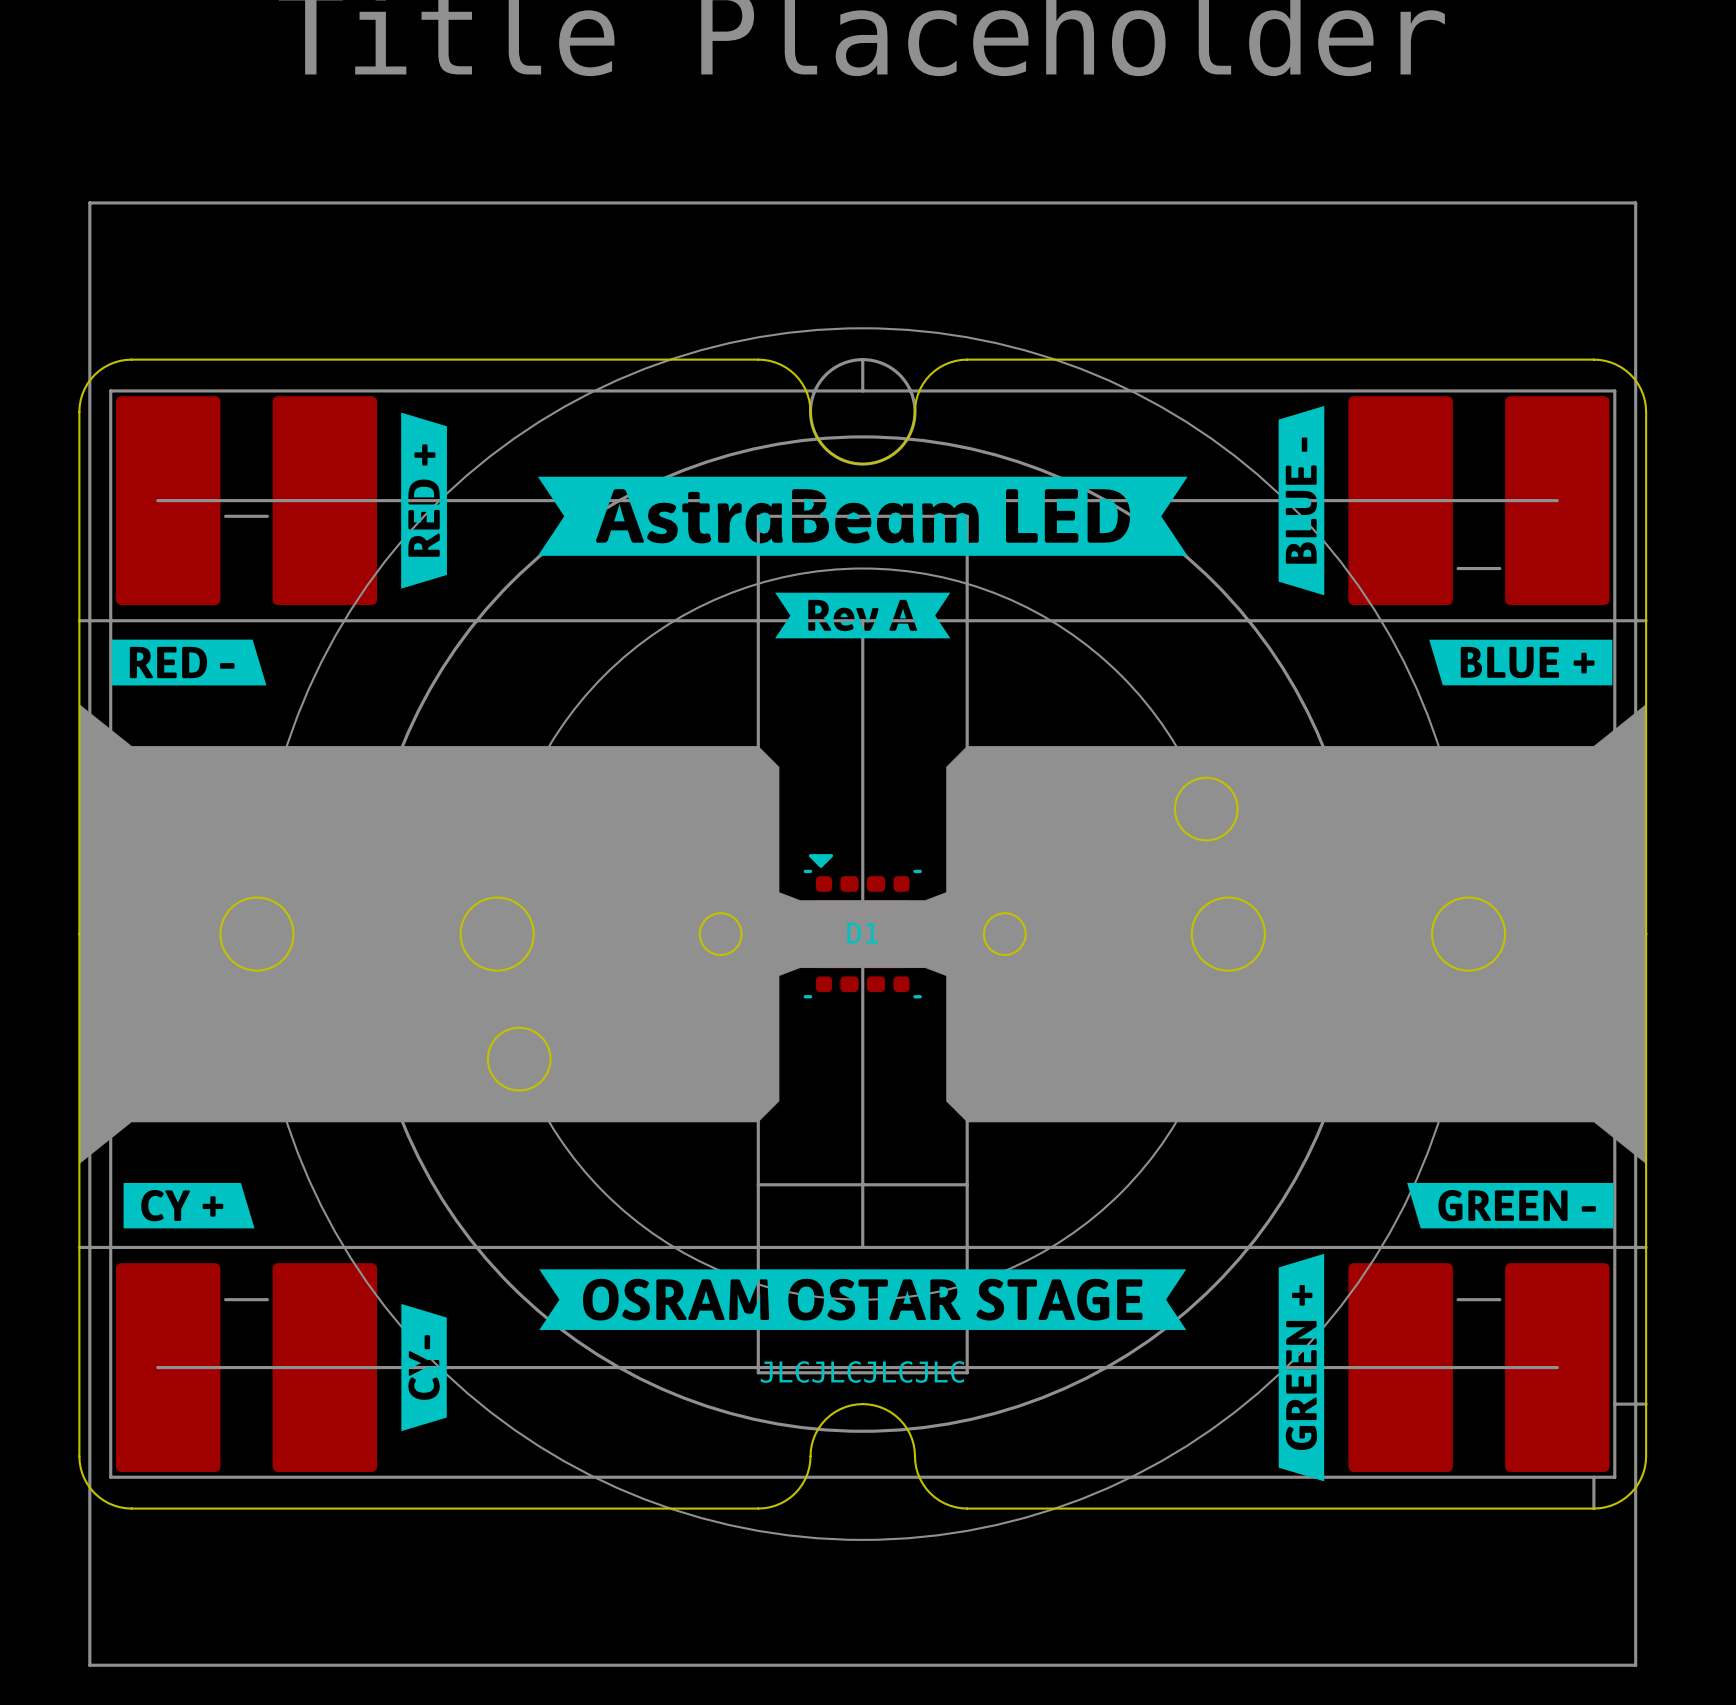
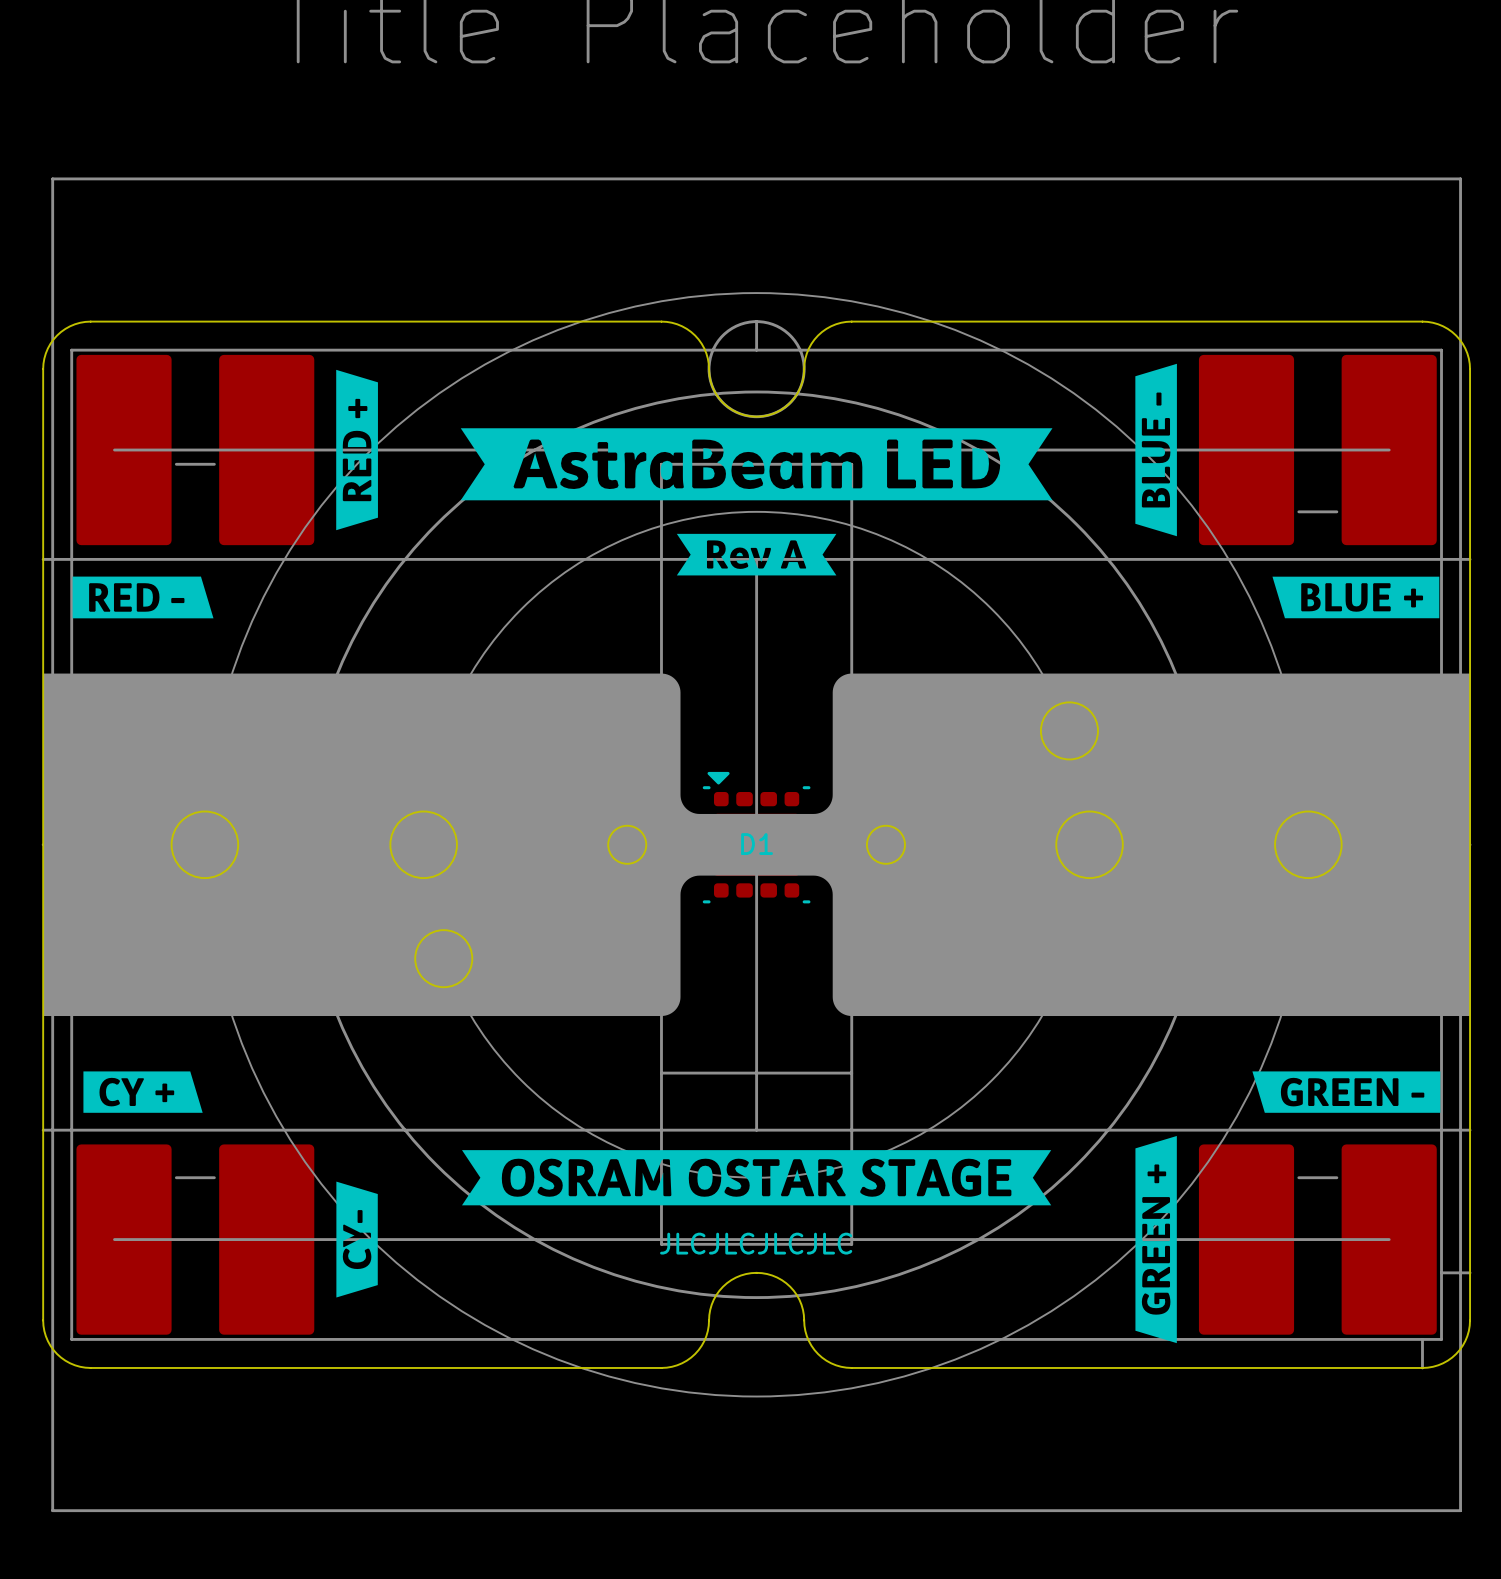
drawing shape: [79, 704, 1647, 1164] -> [43, 673, 1471, 1017]

